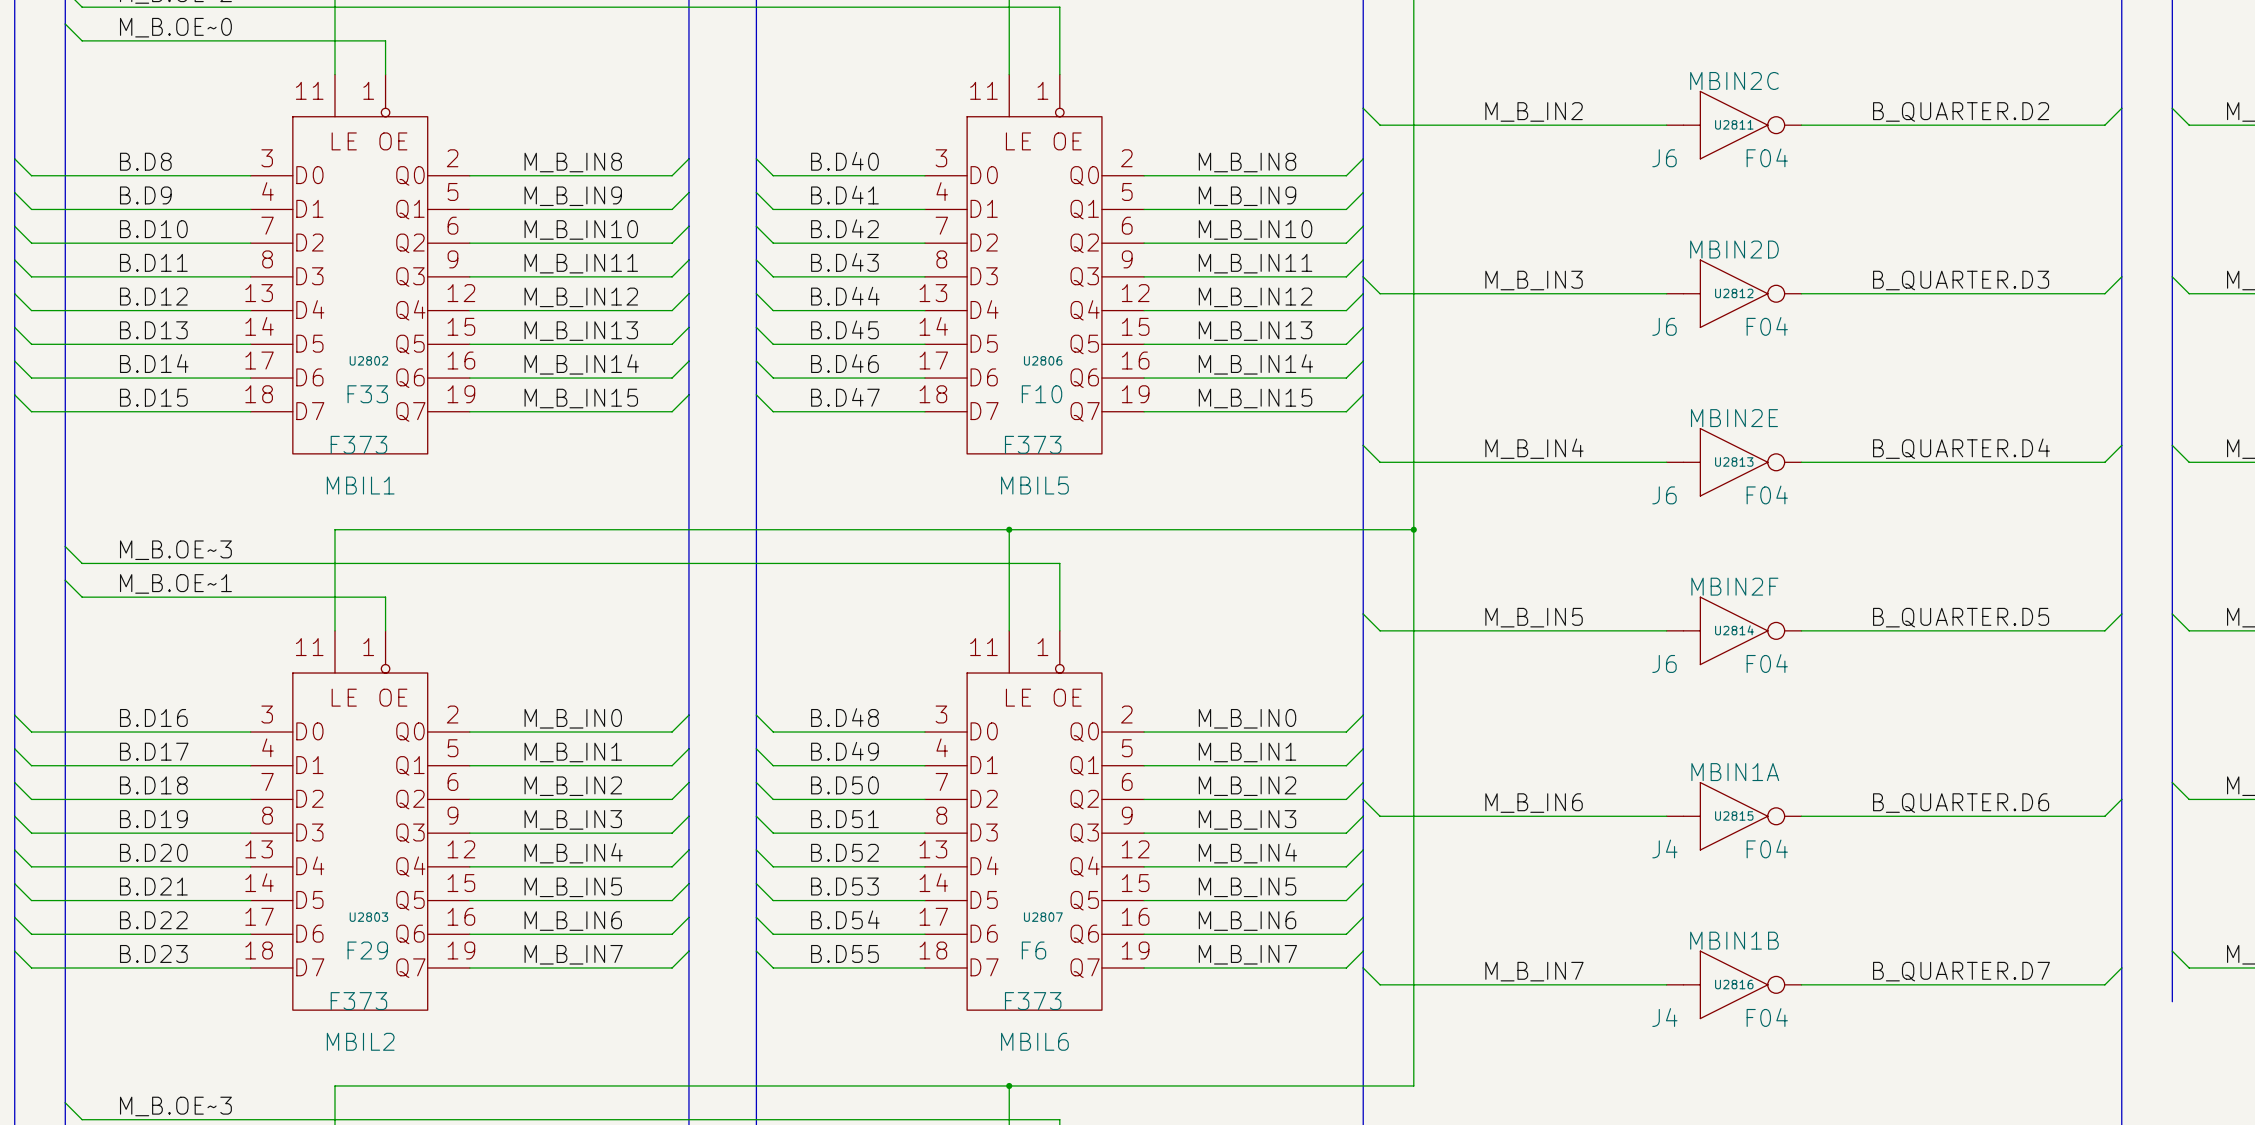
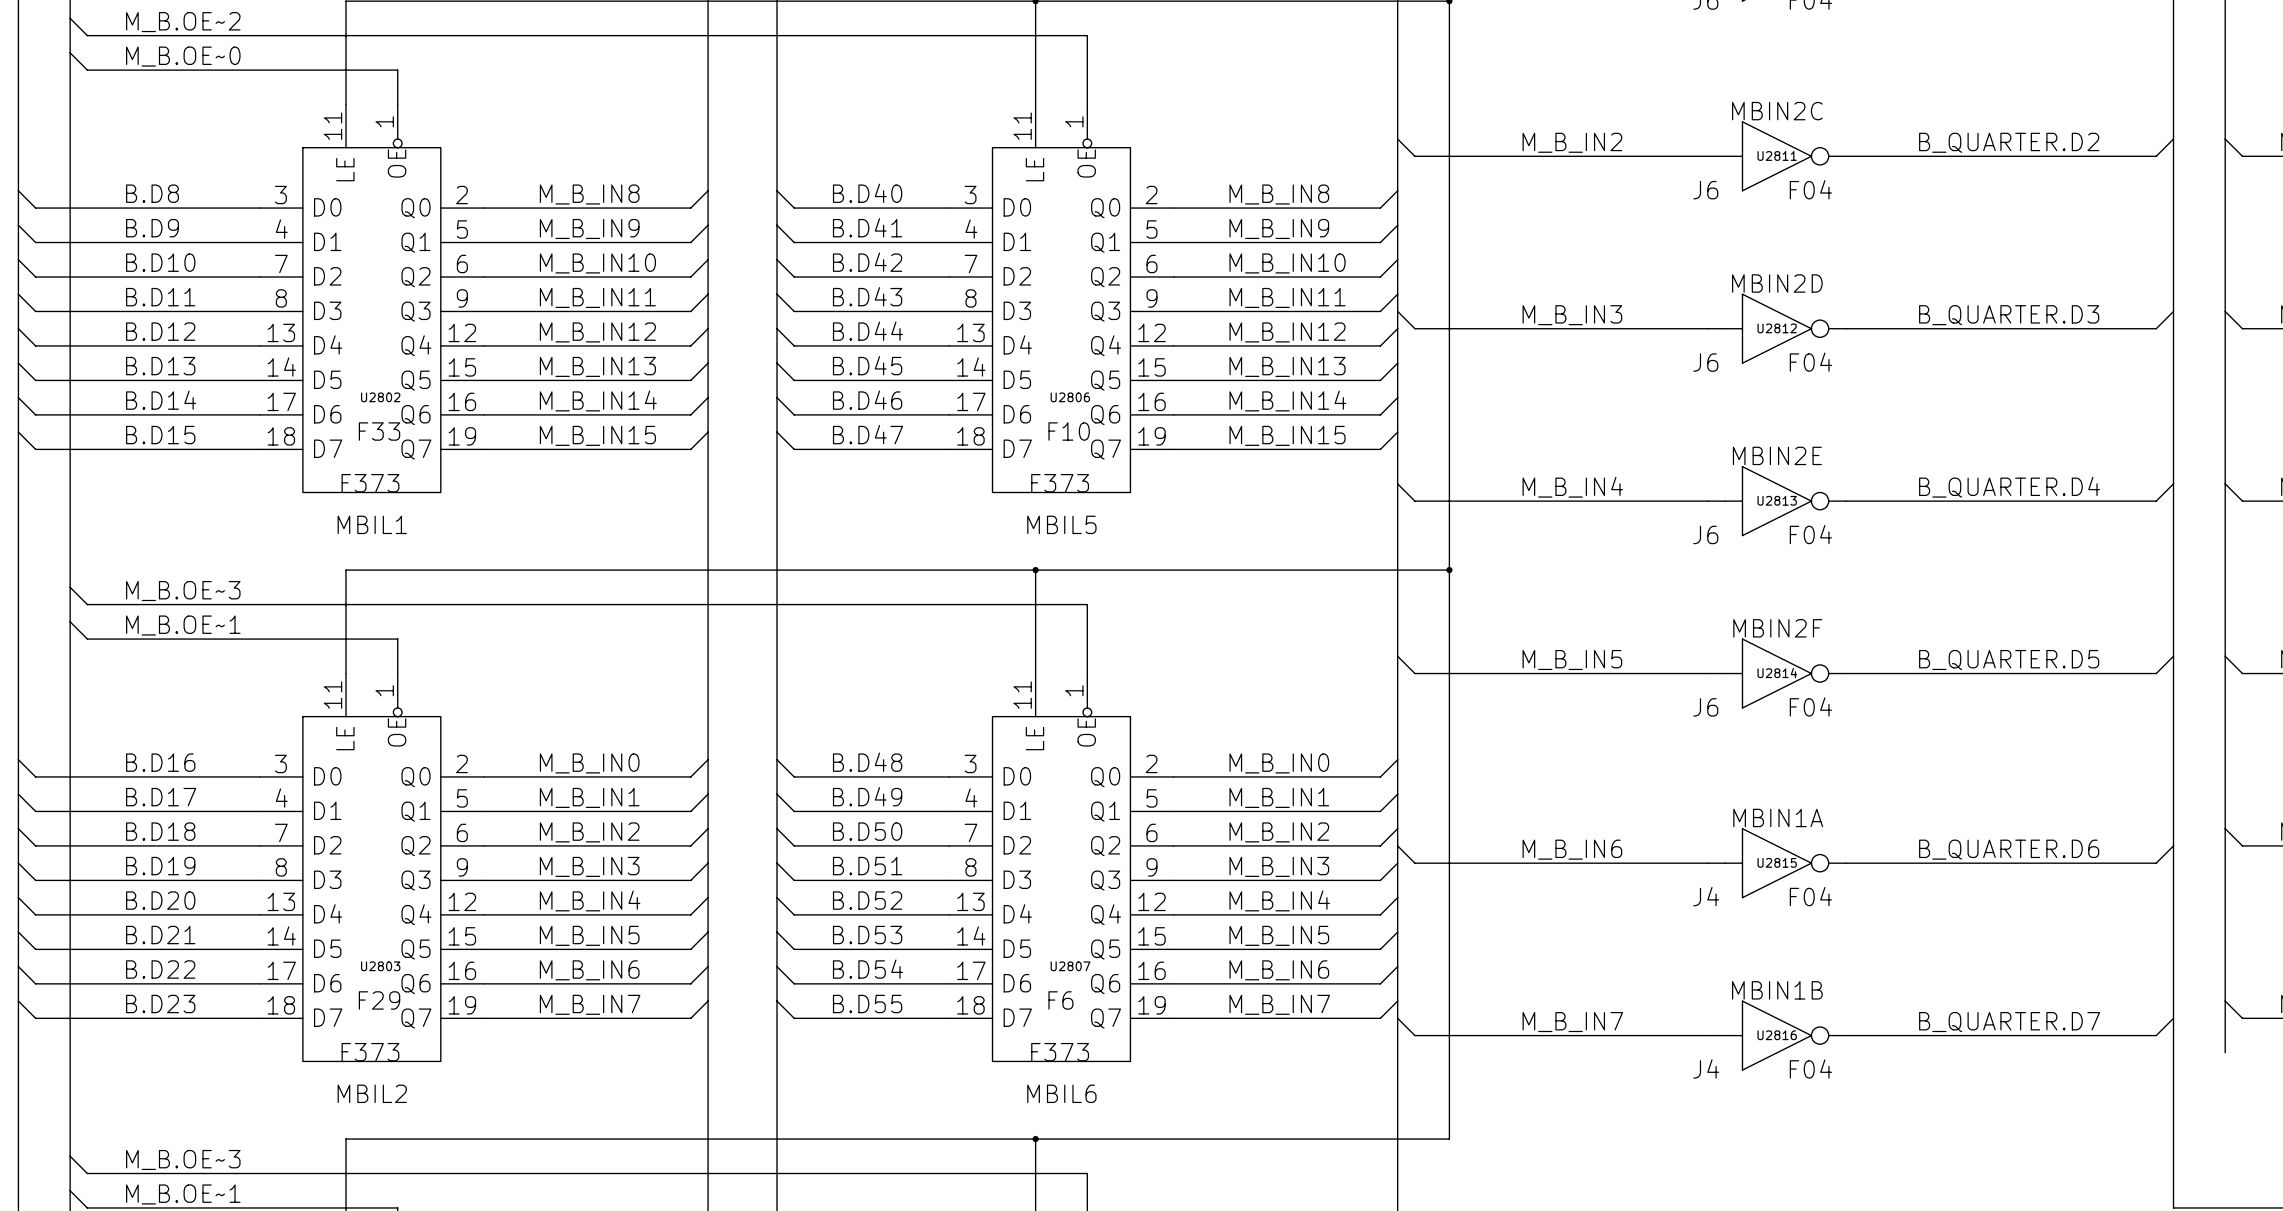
U2802 symbol: [250, 74, 470, 454] -> [259, 104, 484, 493]
U2806 symbol: [924, 74, 1145, 454] -> [949, 104, 1174, 493]
U2803 symbol: [250, 630, 470, 1011] -> [259, 673, 484, 1062]
U2807 symbol: [924, 630, 1145, 1011] -> [949, 673, 1174, 1062]

